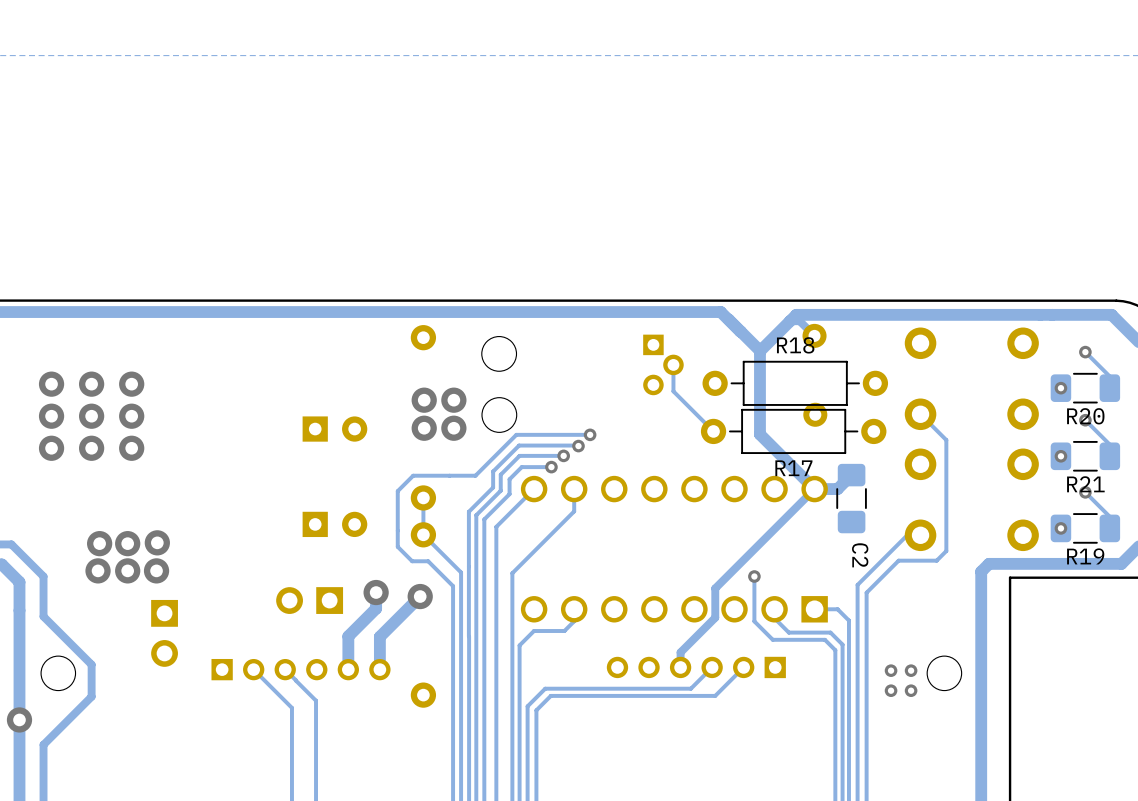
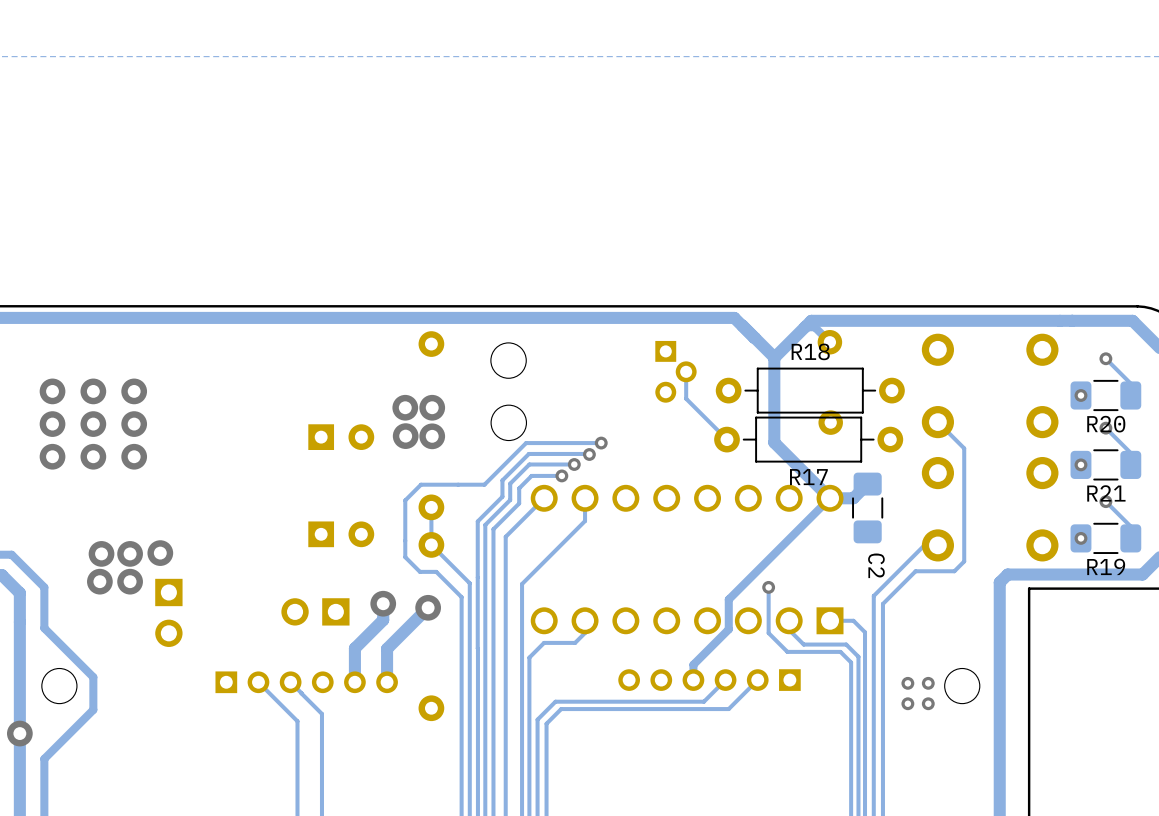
via: none -> (405, 407)
via: (453, 400) -> none
via: none -> (405, 436)
via: (453, 428) -> none
via: (156, 570) -> none
part position: (164, 633) -> (168, 612)

